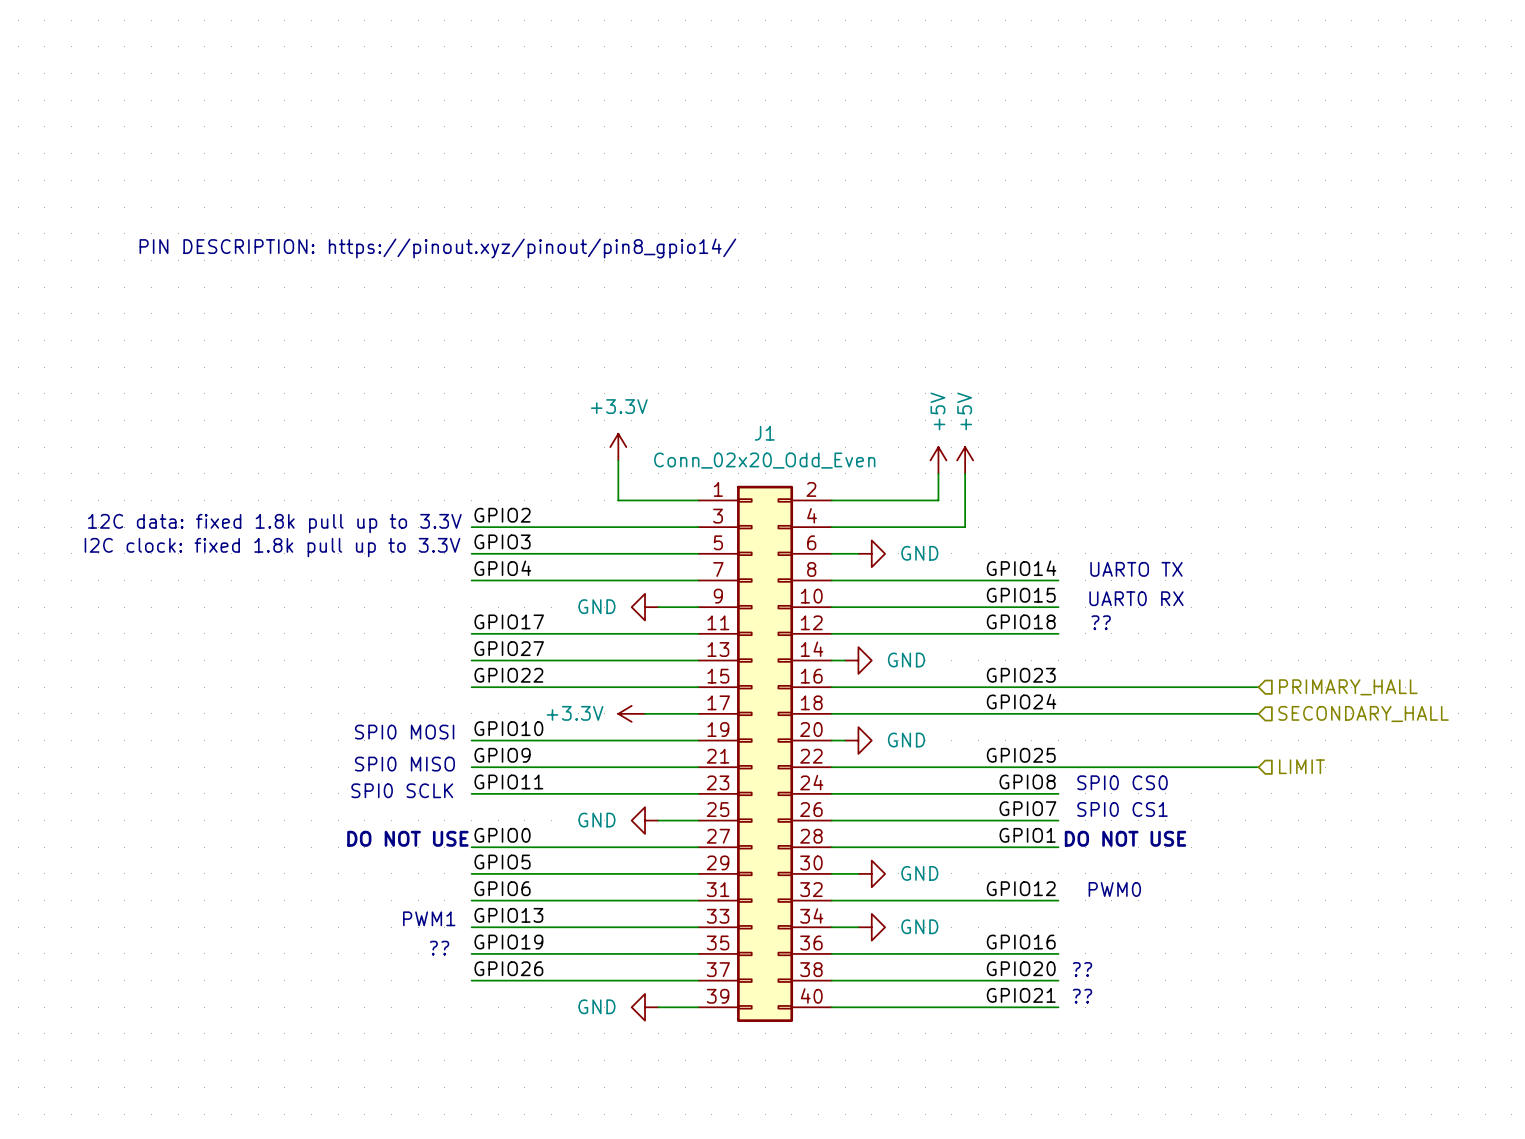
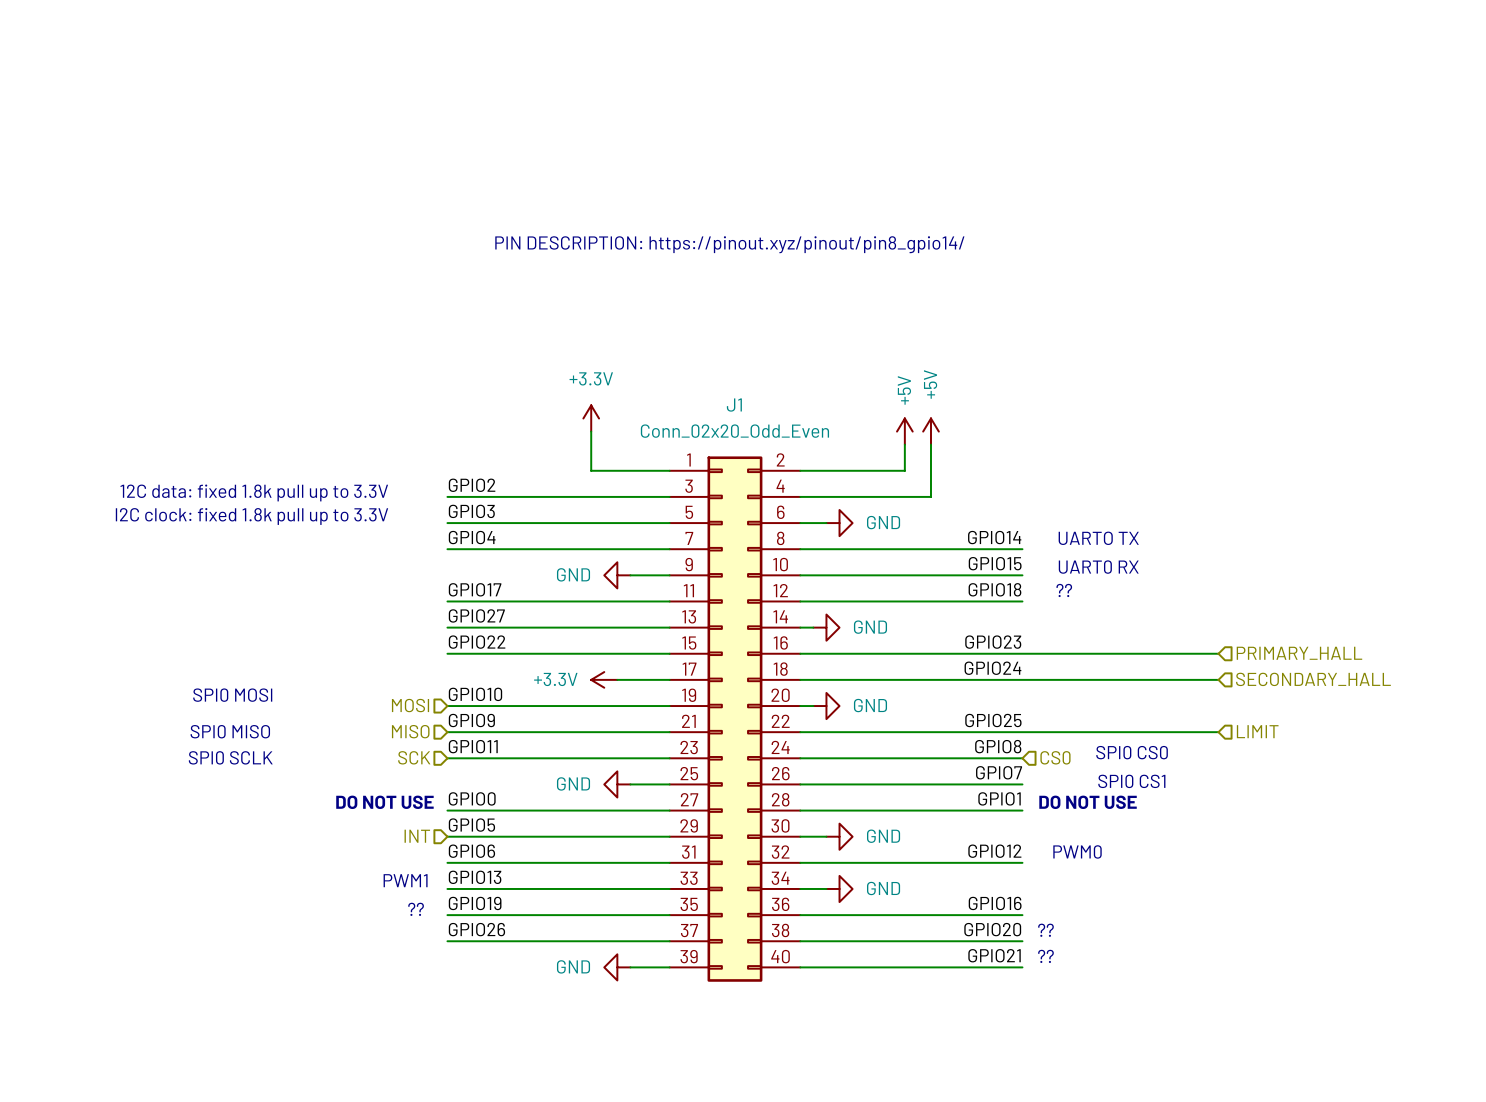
text: PIN DESCRIPTION: https://pinout.xyz/pinout/pin8_gpio14/ (437, 248) -> none
text: none -> PIN DESCRIPTION: https://pinout.xyz/pinout/pin8_gpio14/ (729, 244)
text position: SPI0 MOSI (404, 732) -> SPI0 MOSI (232, 695)
hierarchical label: none -> MOSI (410, 705)
text position: SPI0 MISO (404, 764) -> SPI0 MISO (230, 731)
hierarchical label: none -> MISO (410, 731)
text position: SPI0 CS0 (1122, 782) -> SPI0 CS0 (1132, 752)
text position: SPI0 SCLK (402, 790) -> SPI0 SCLK (230, 757)
hierarchical label: none -> SCK (414, 757)
hierarchical label: none -> CS0 (1055, 757)
text position: SPI0 CS1 (1122, 809) -> SPI0 CS1 (1131, 781)
hierarchical label: none -> INT (417, 836)

